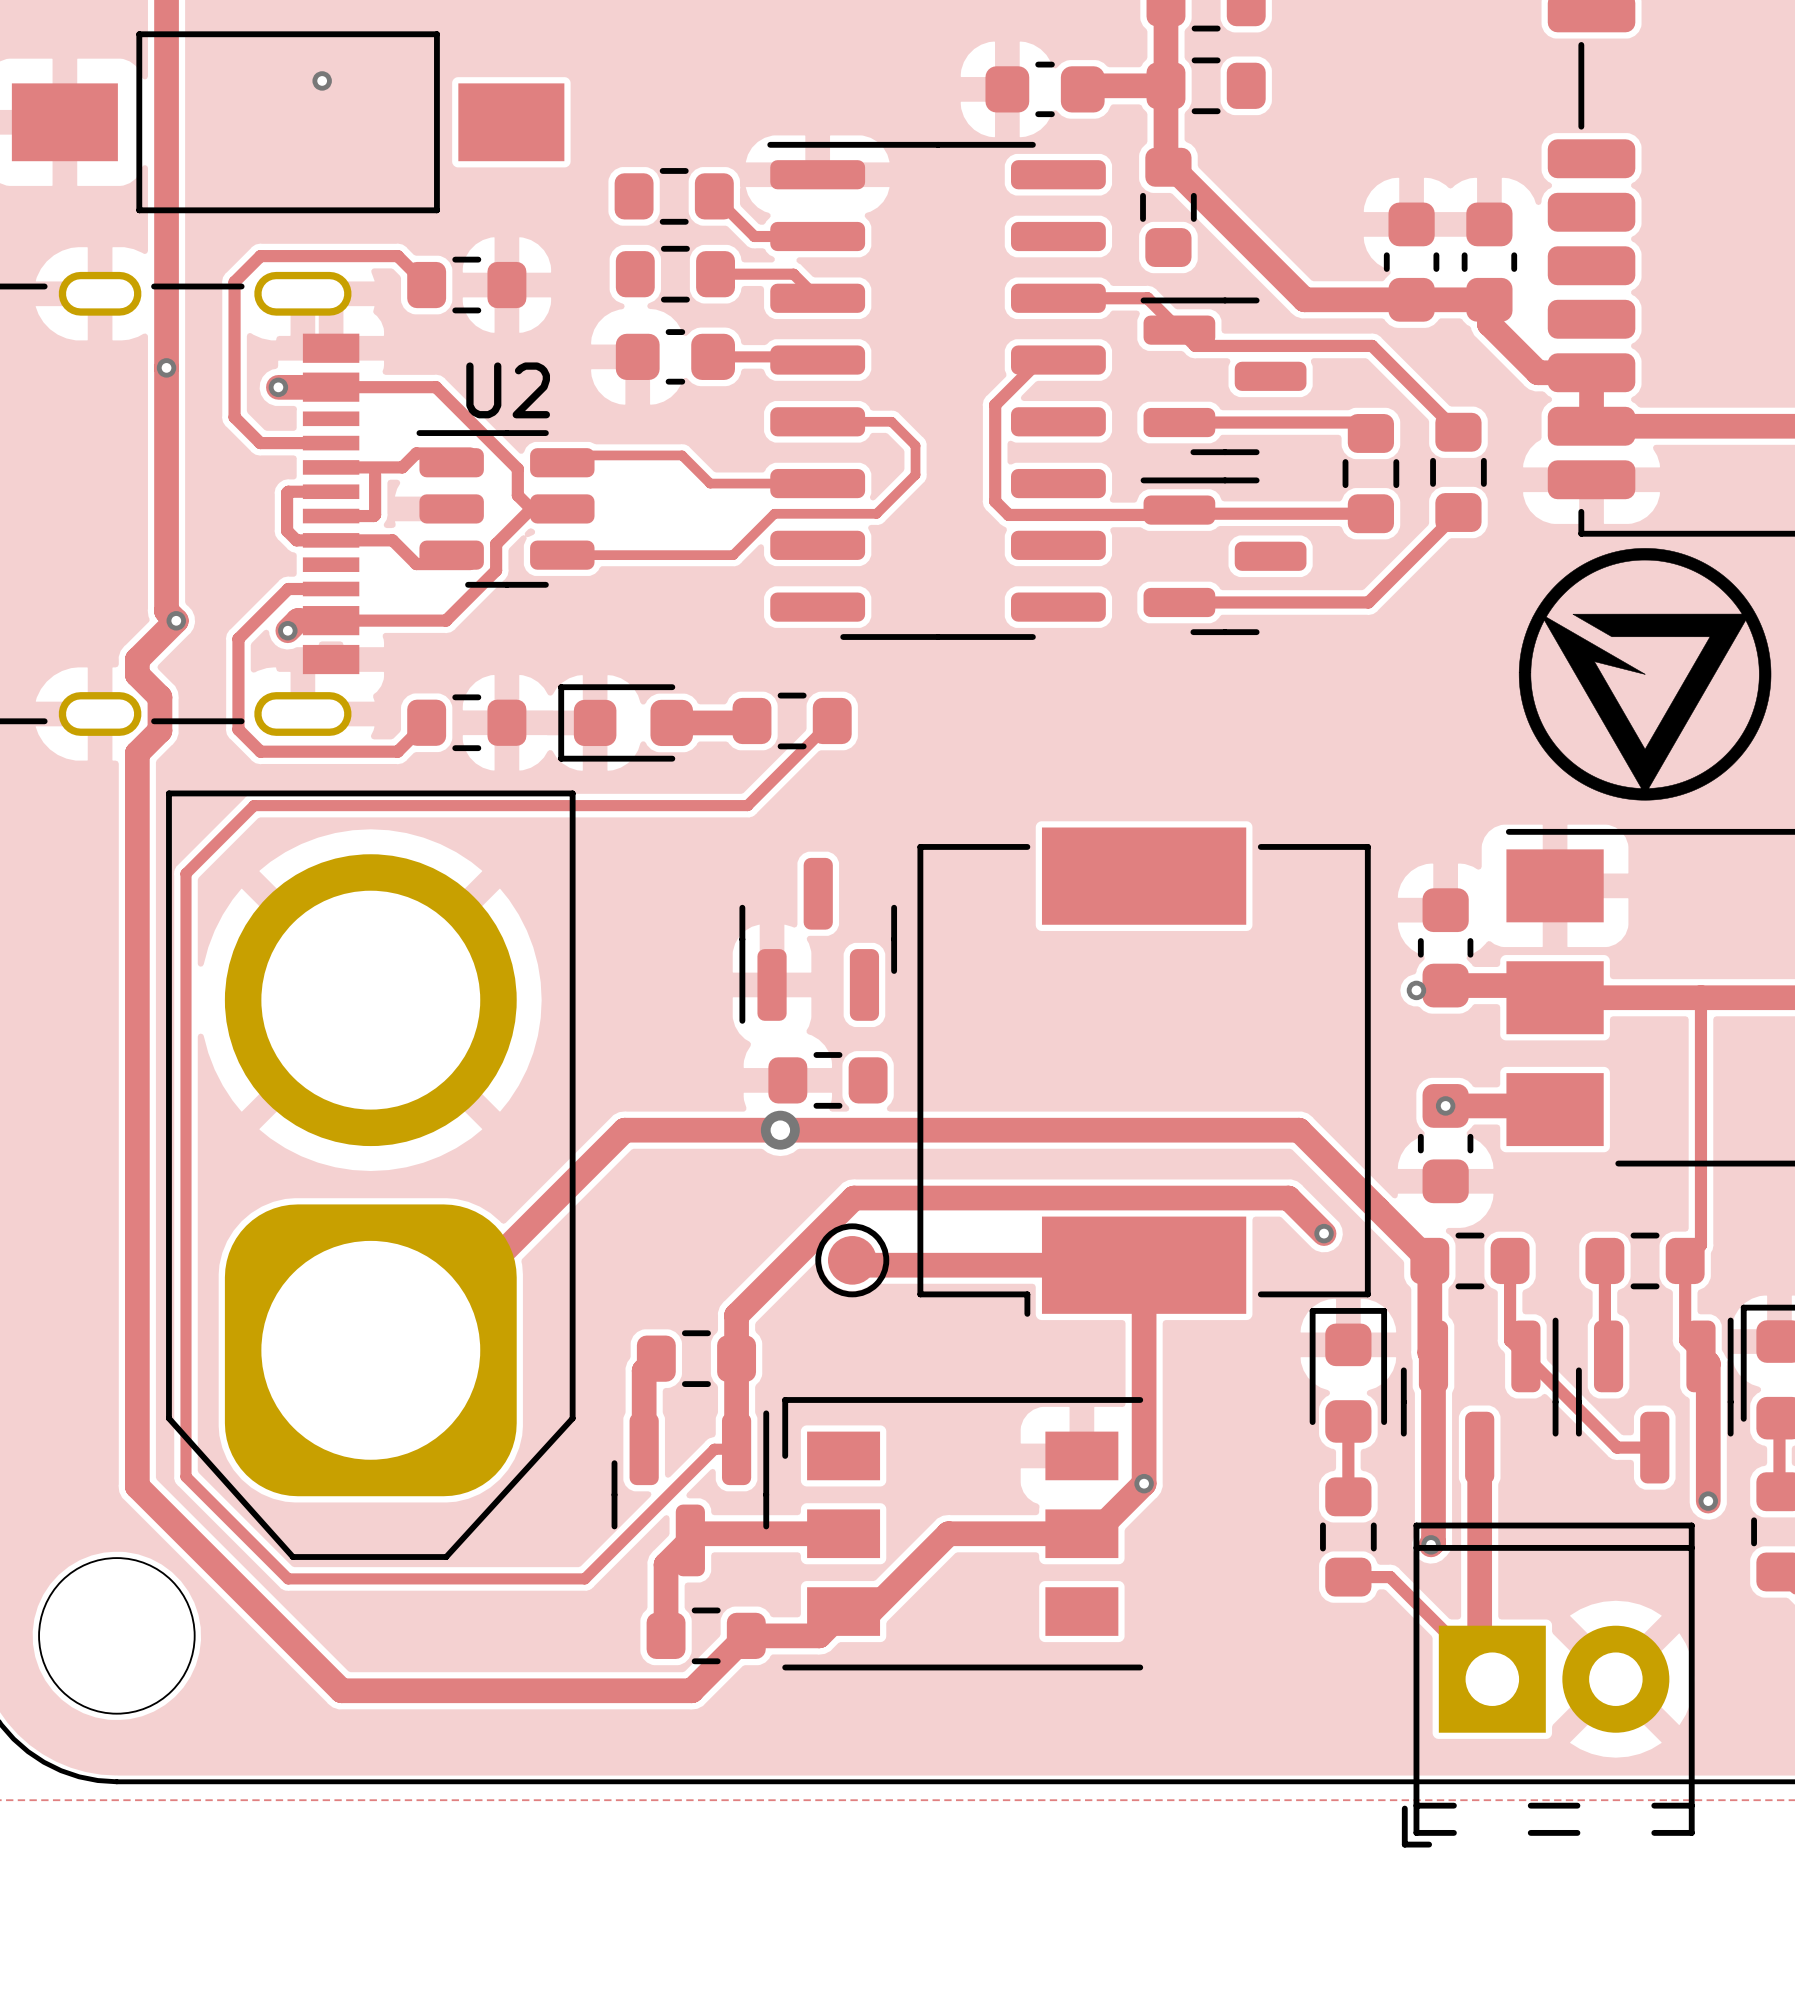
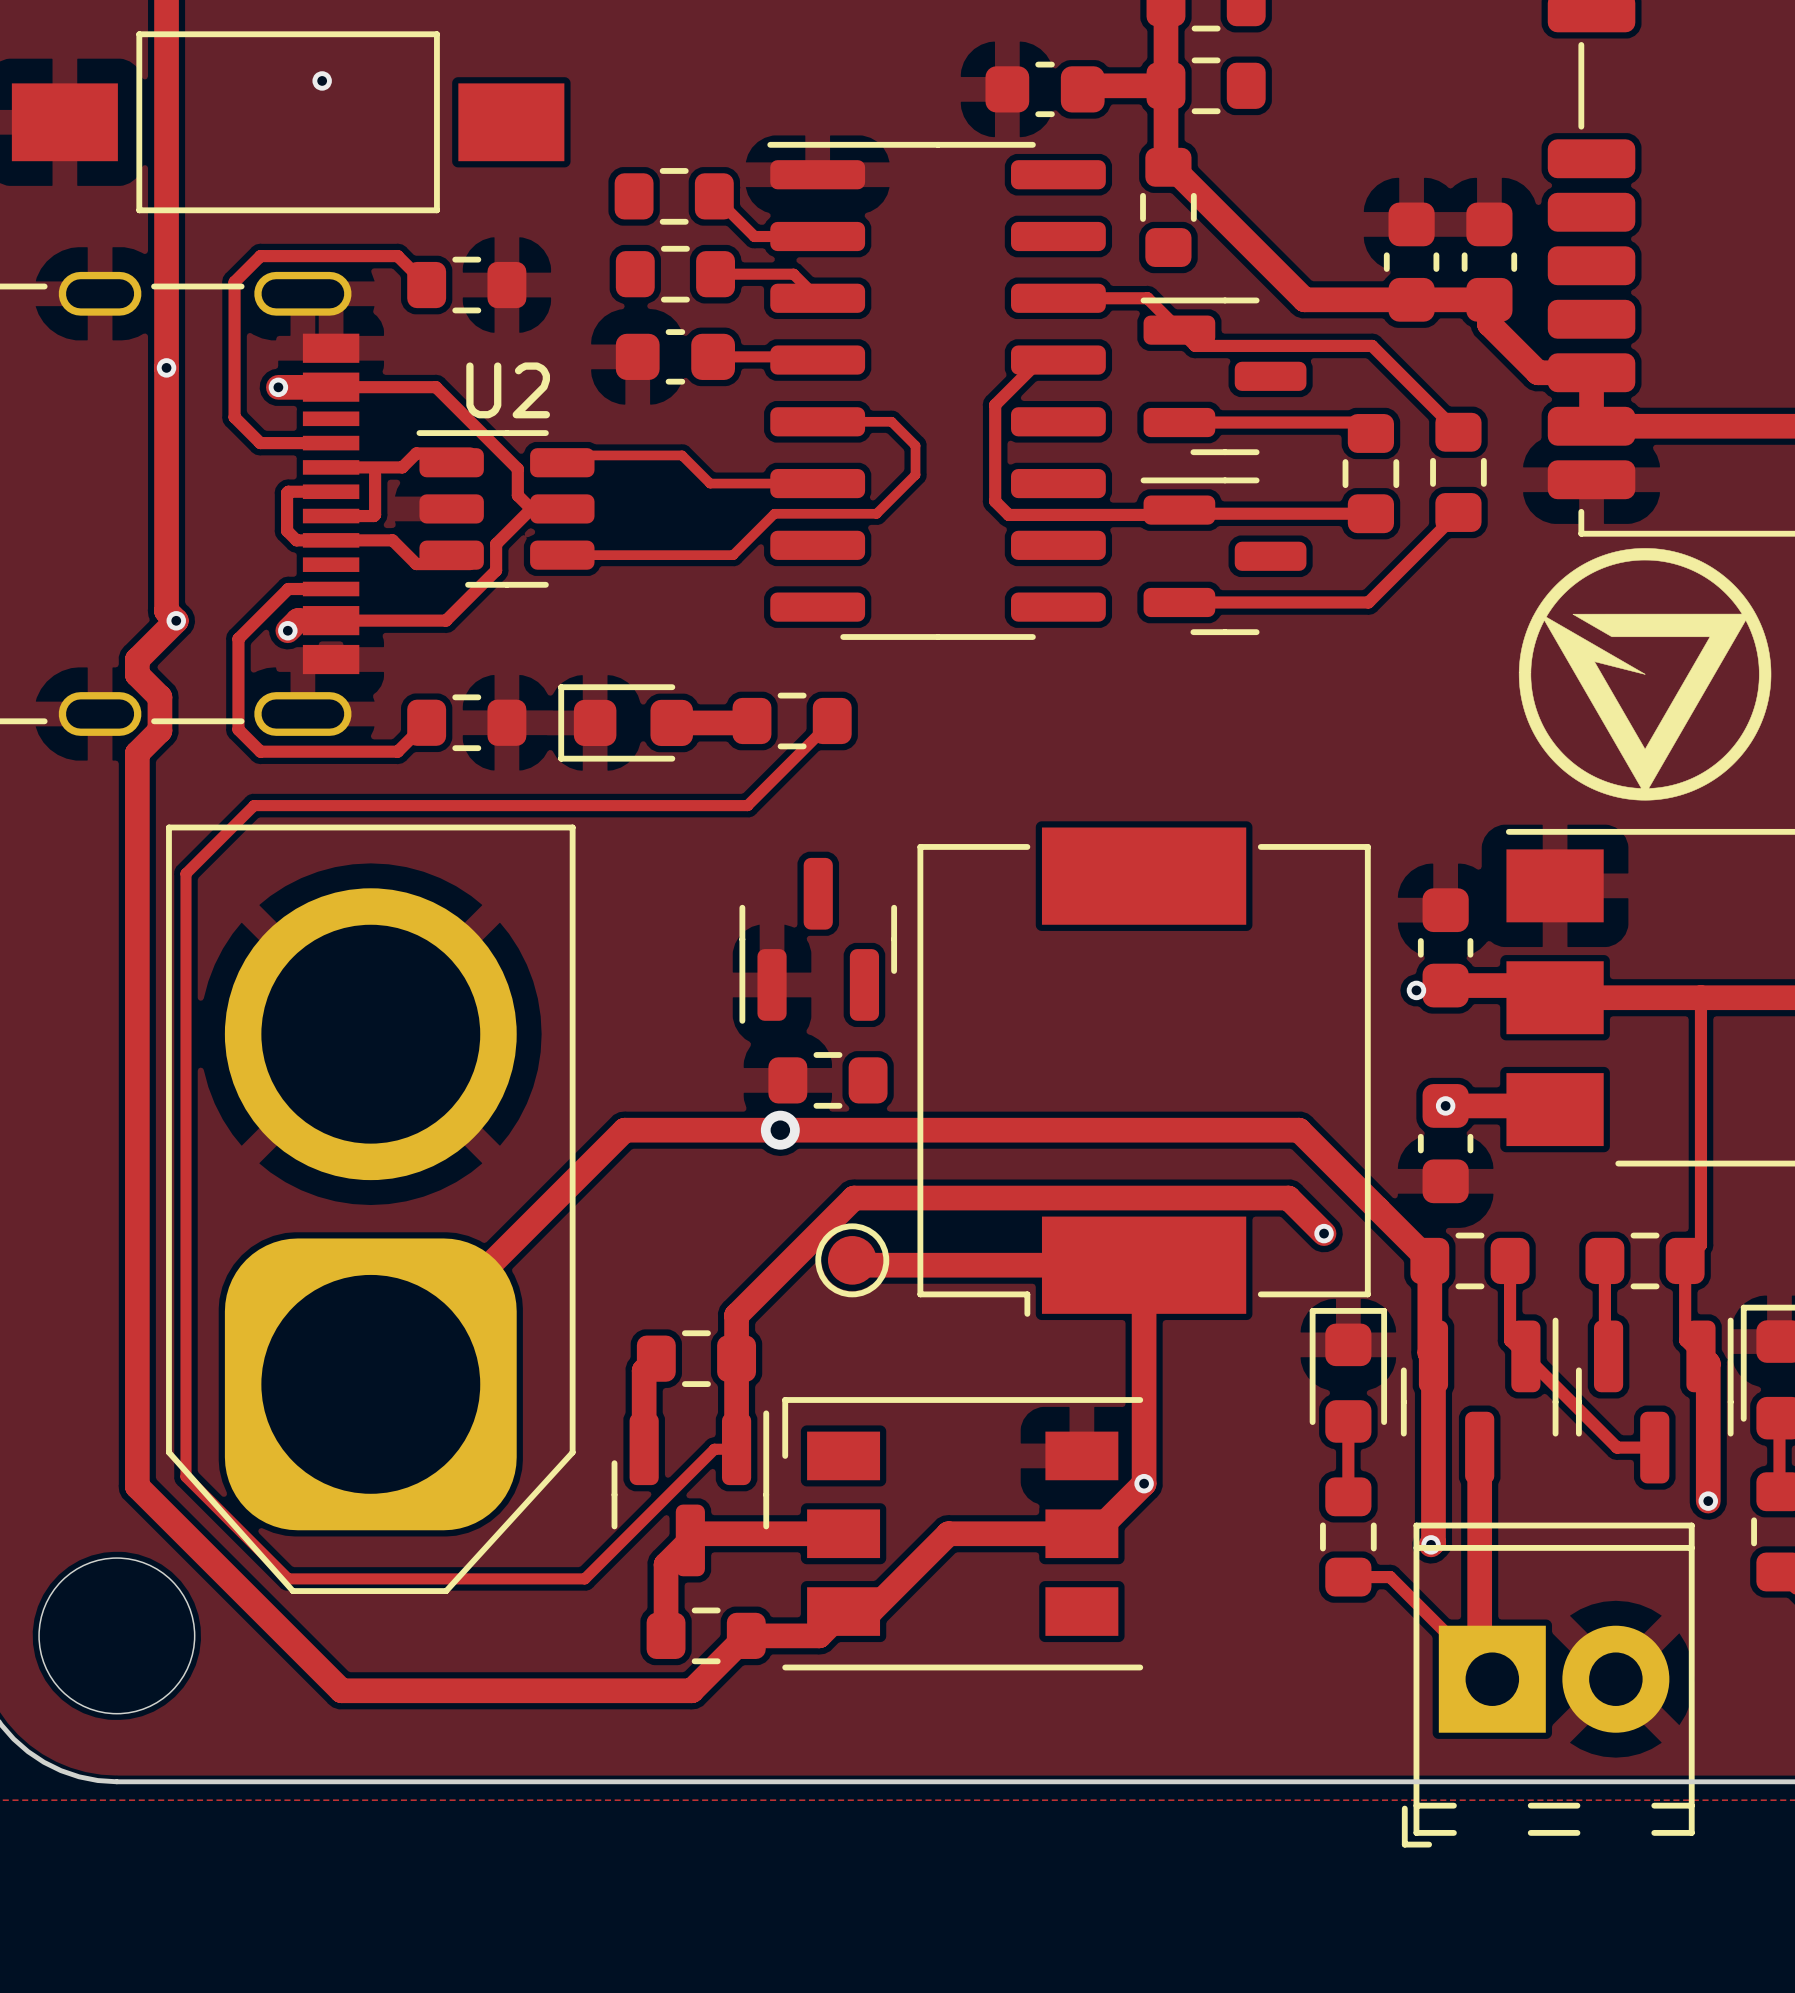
part position: (370, 1175) -> (370, 1209)

